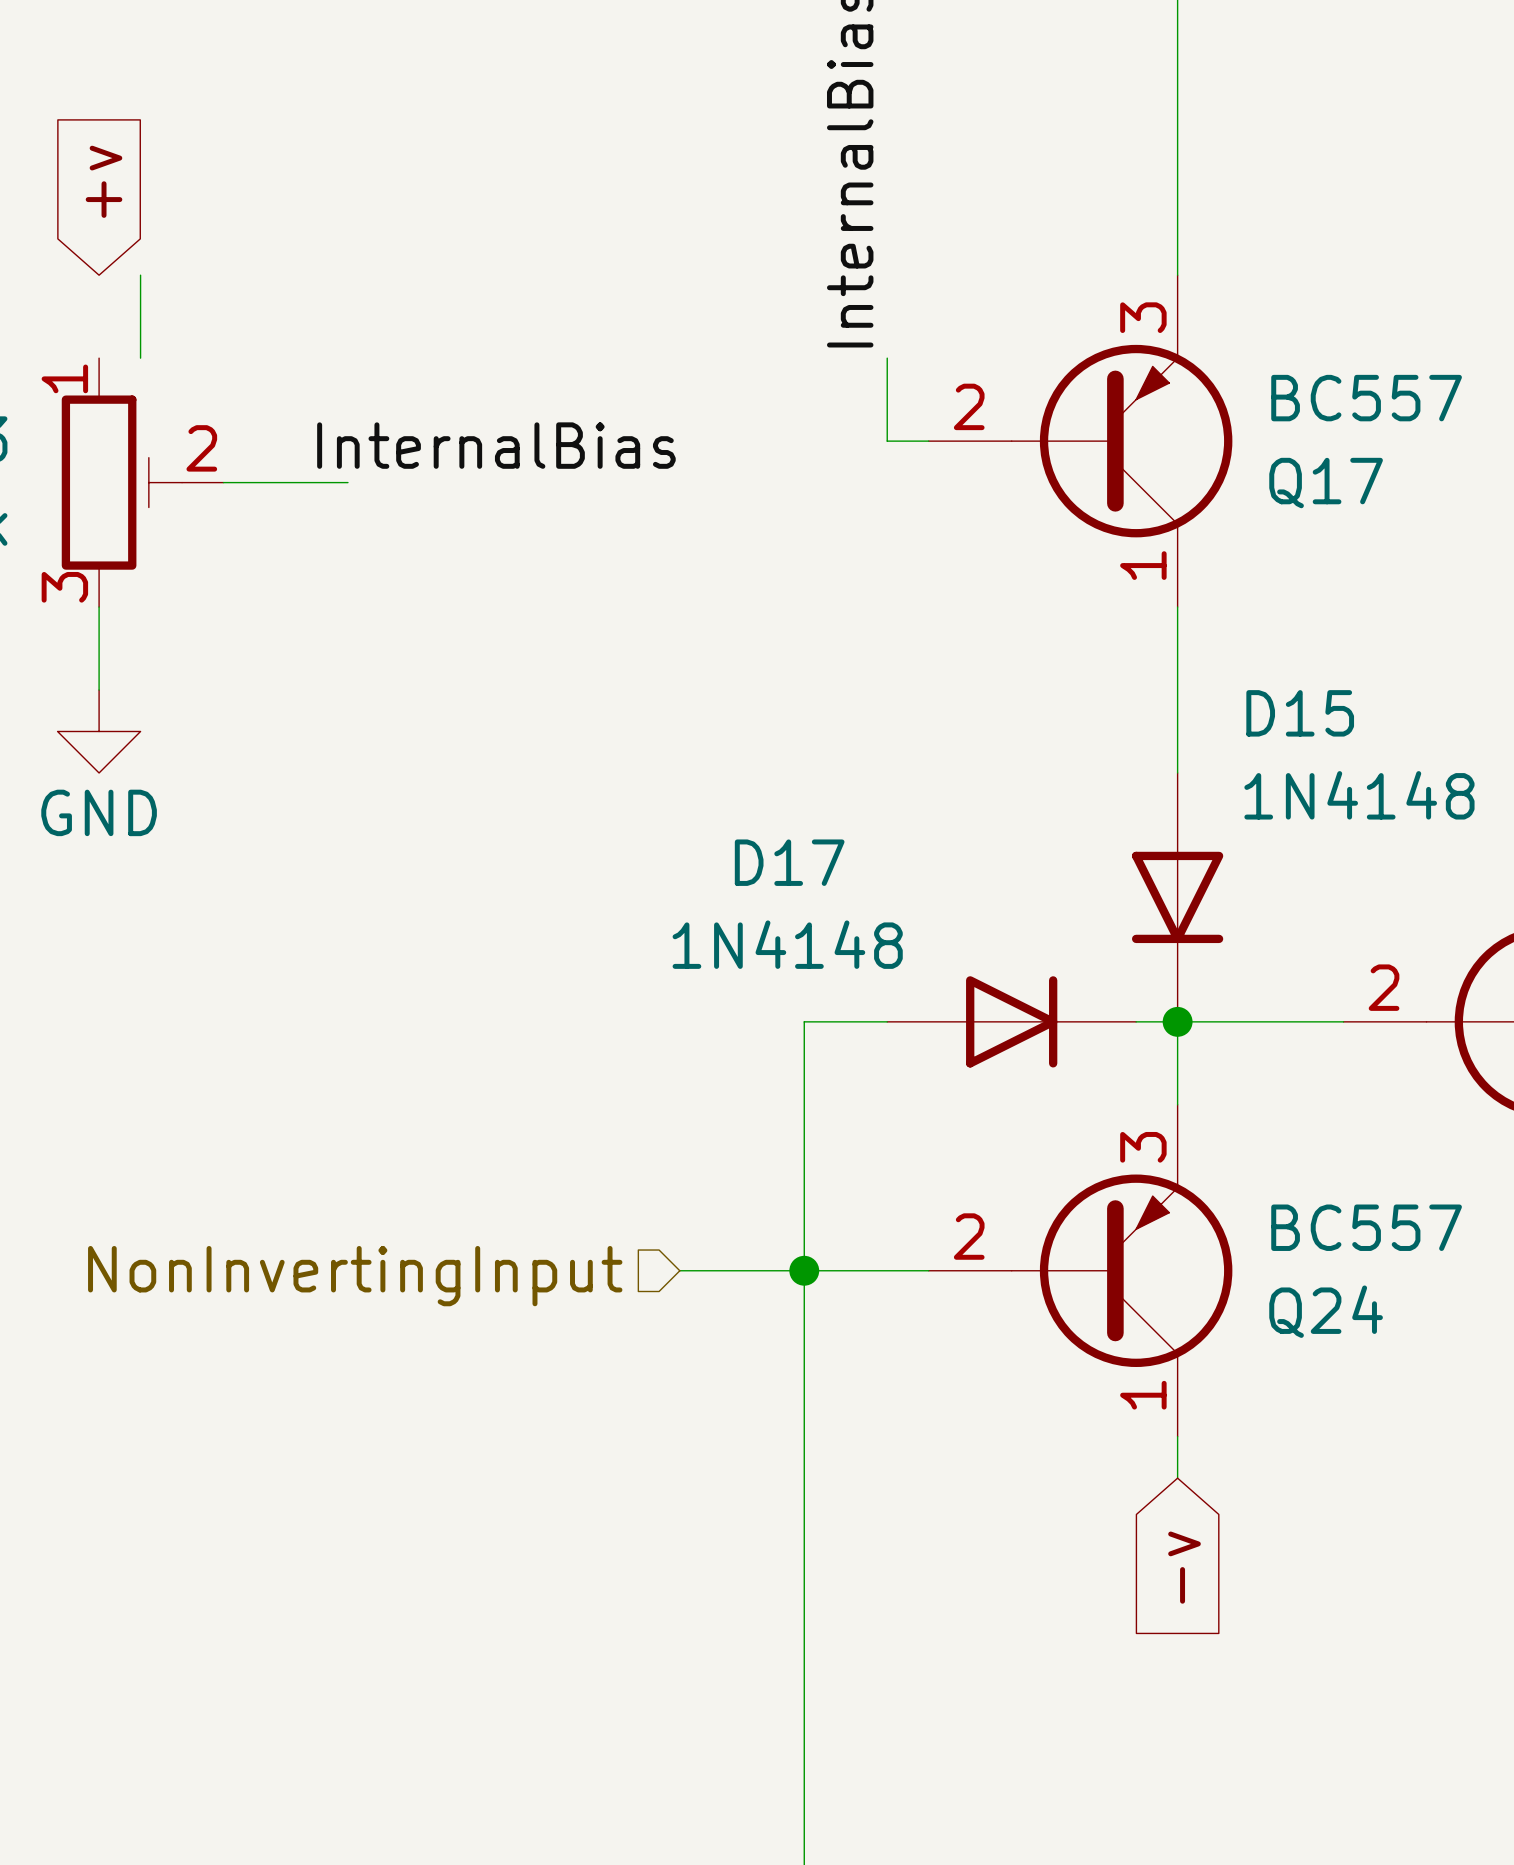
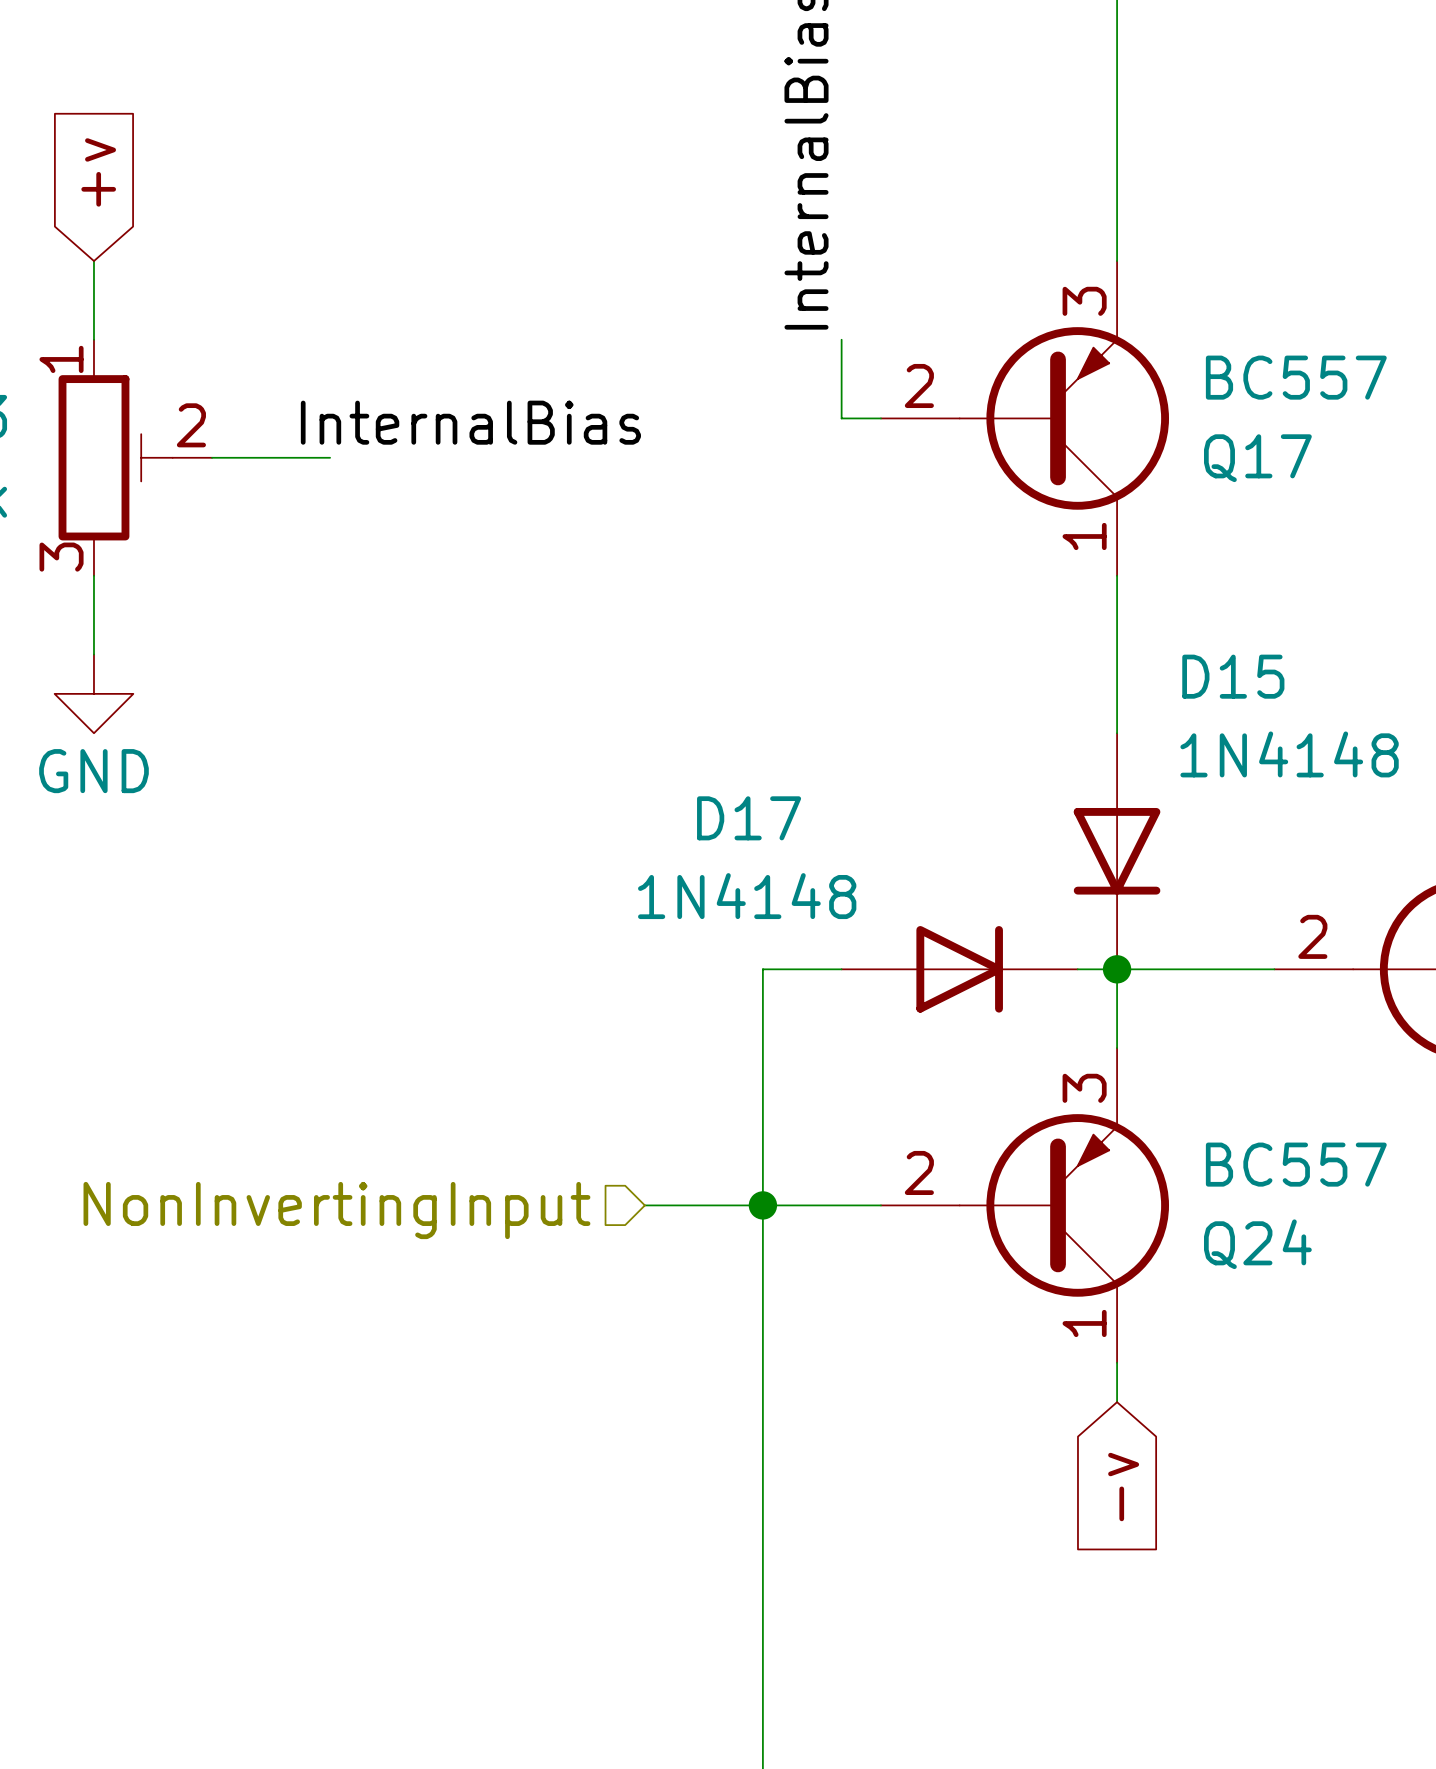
wire: (140, 275) (140, 358) -> (93, 261) (93, 339)

